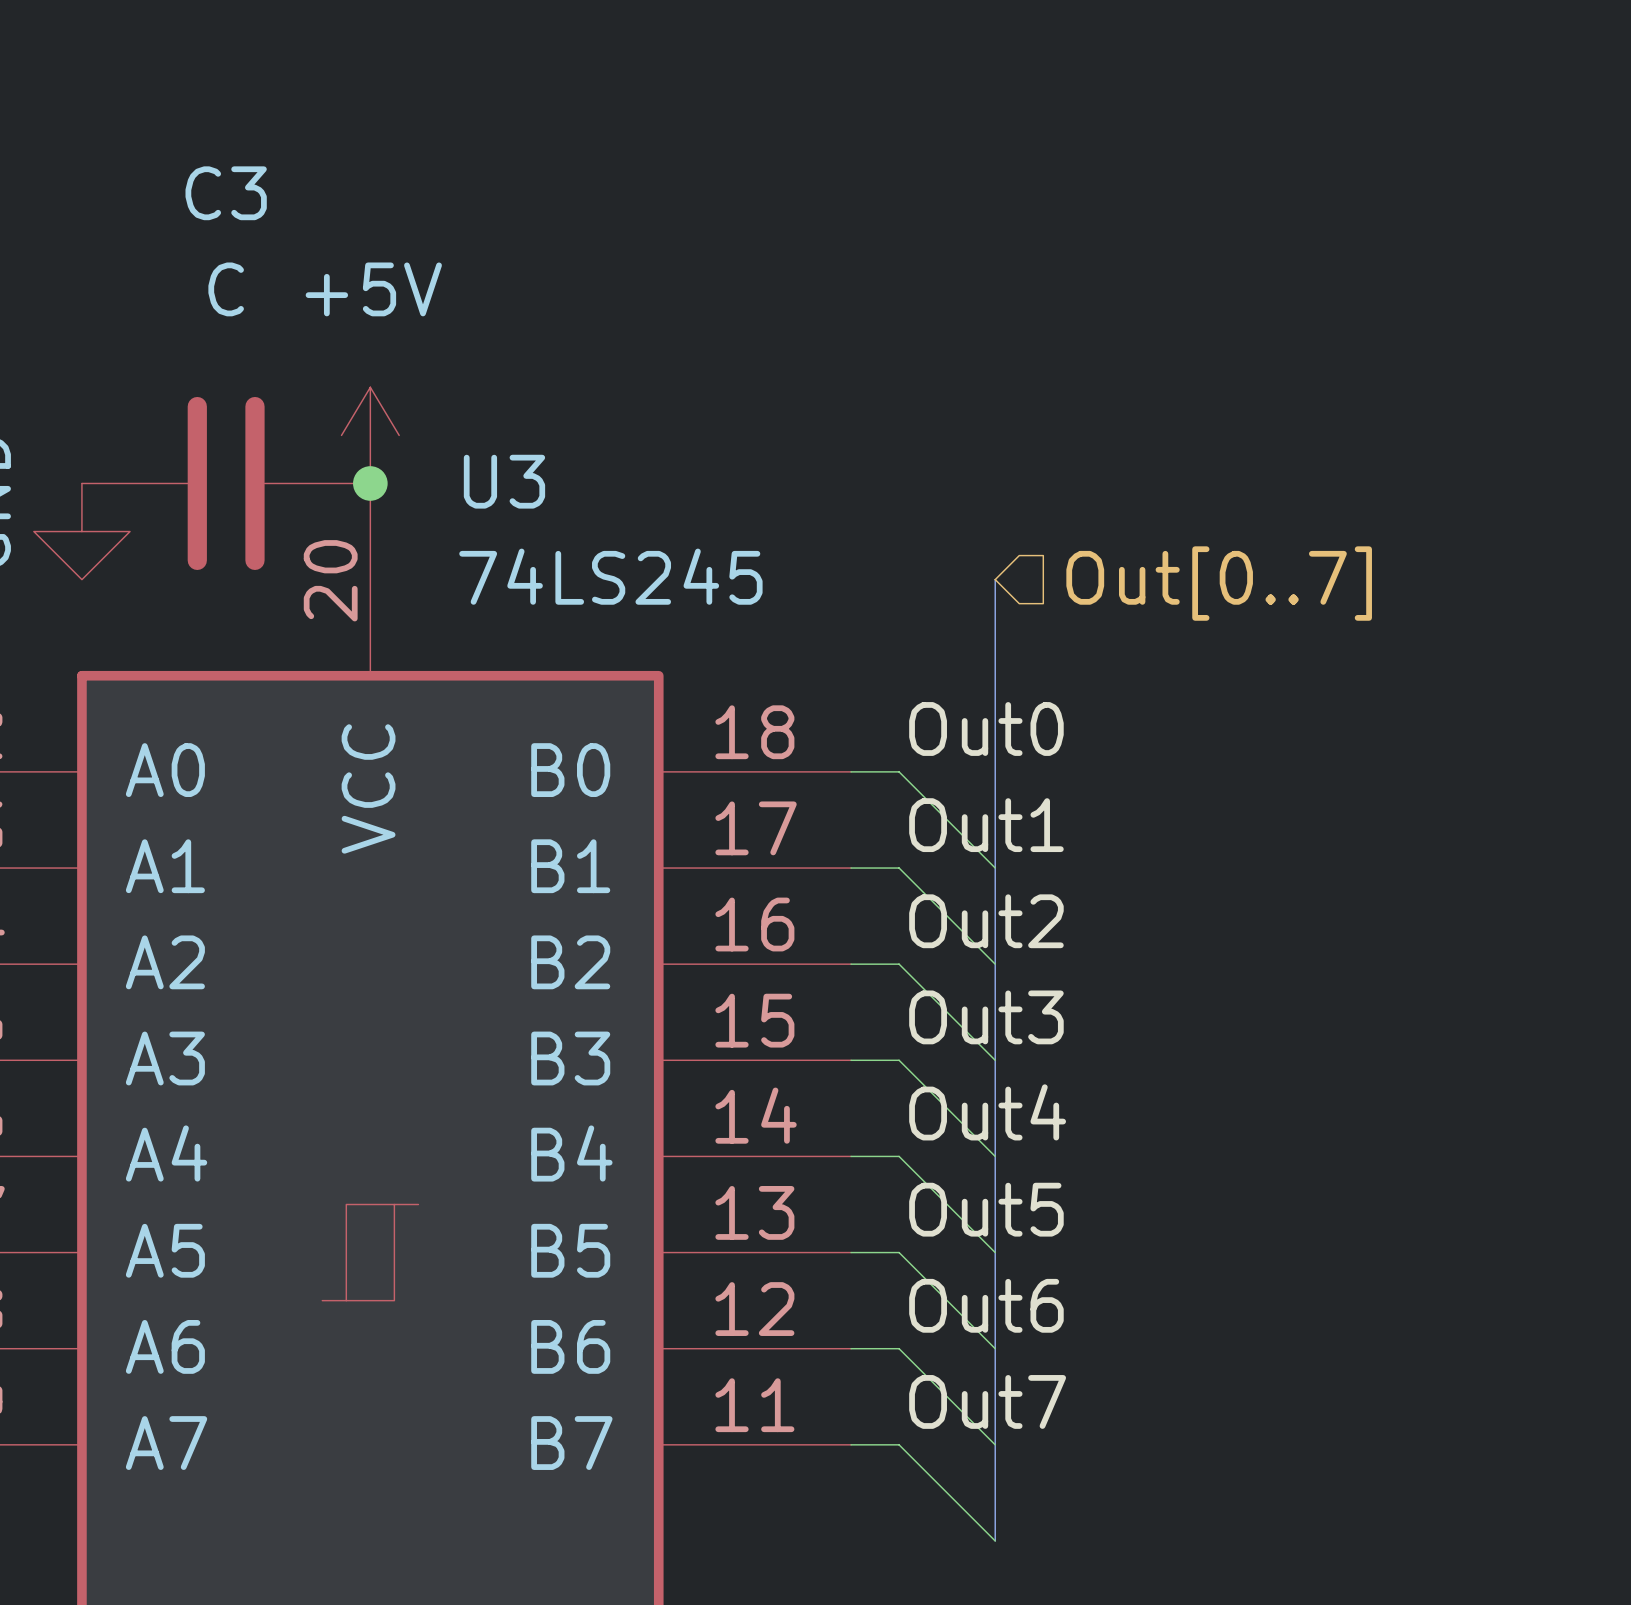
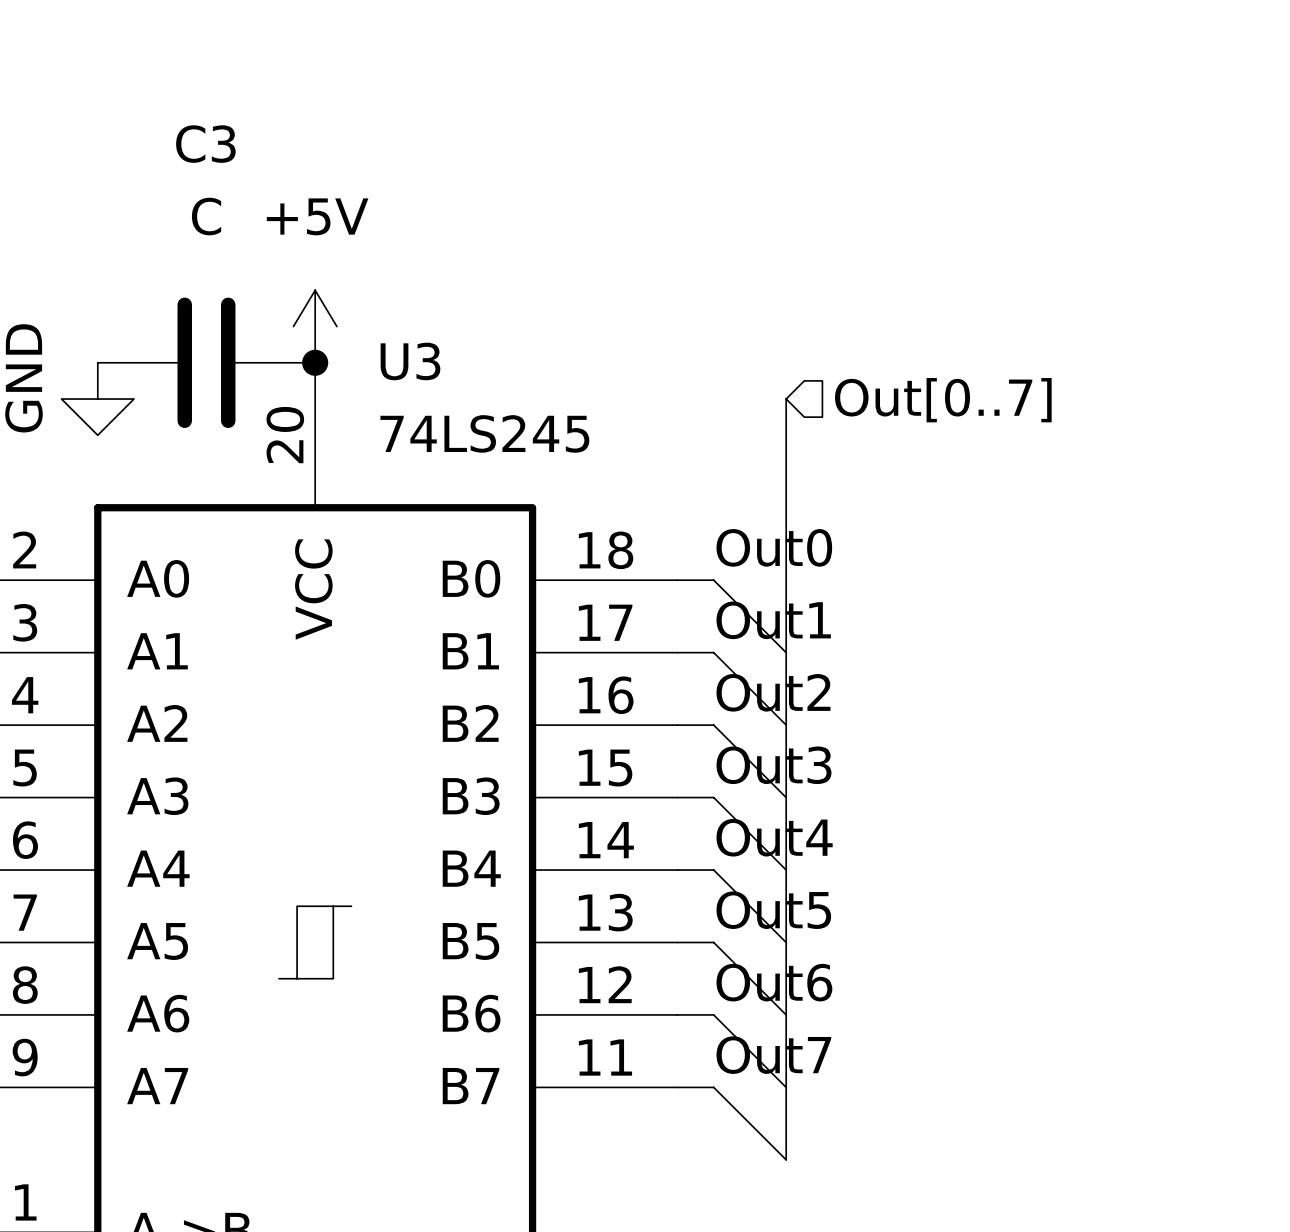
bus: none -> (786, 399) (786, 435)
hierarchical label position: Out[0..7] (1219, 583) -> Out[0..7] (943, 400)

